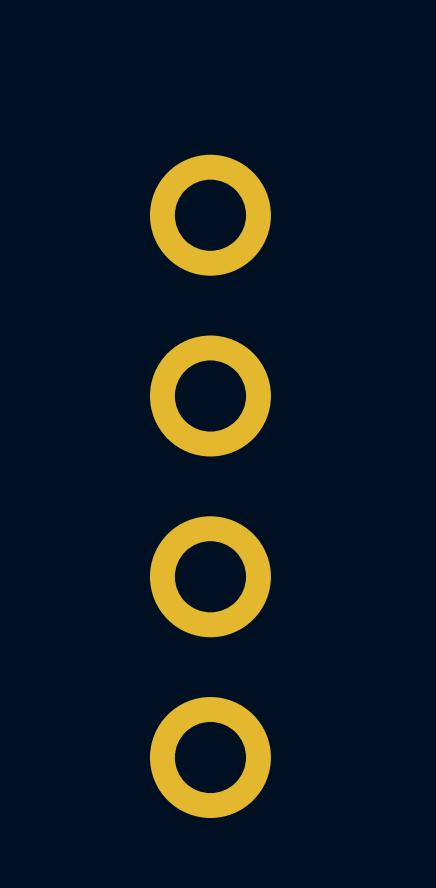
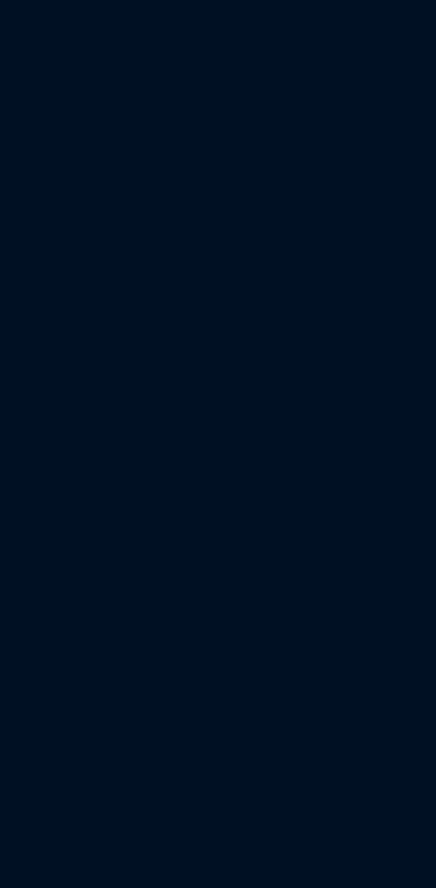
part: (210, 486) -> none

